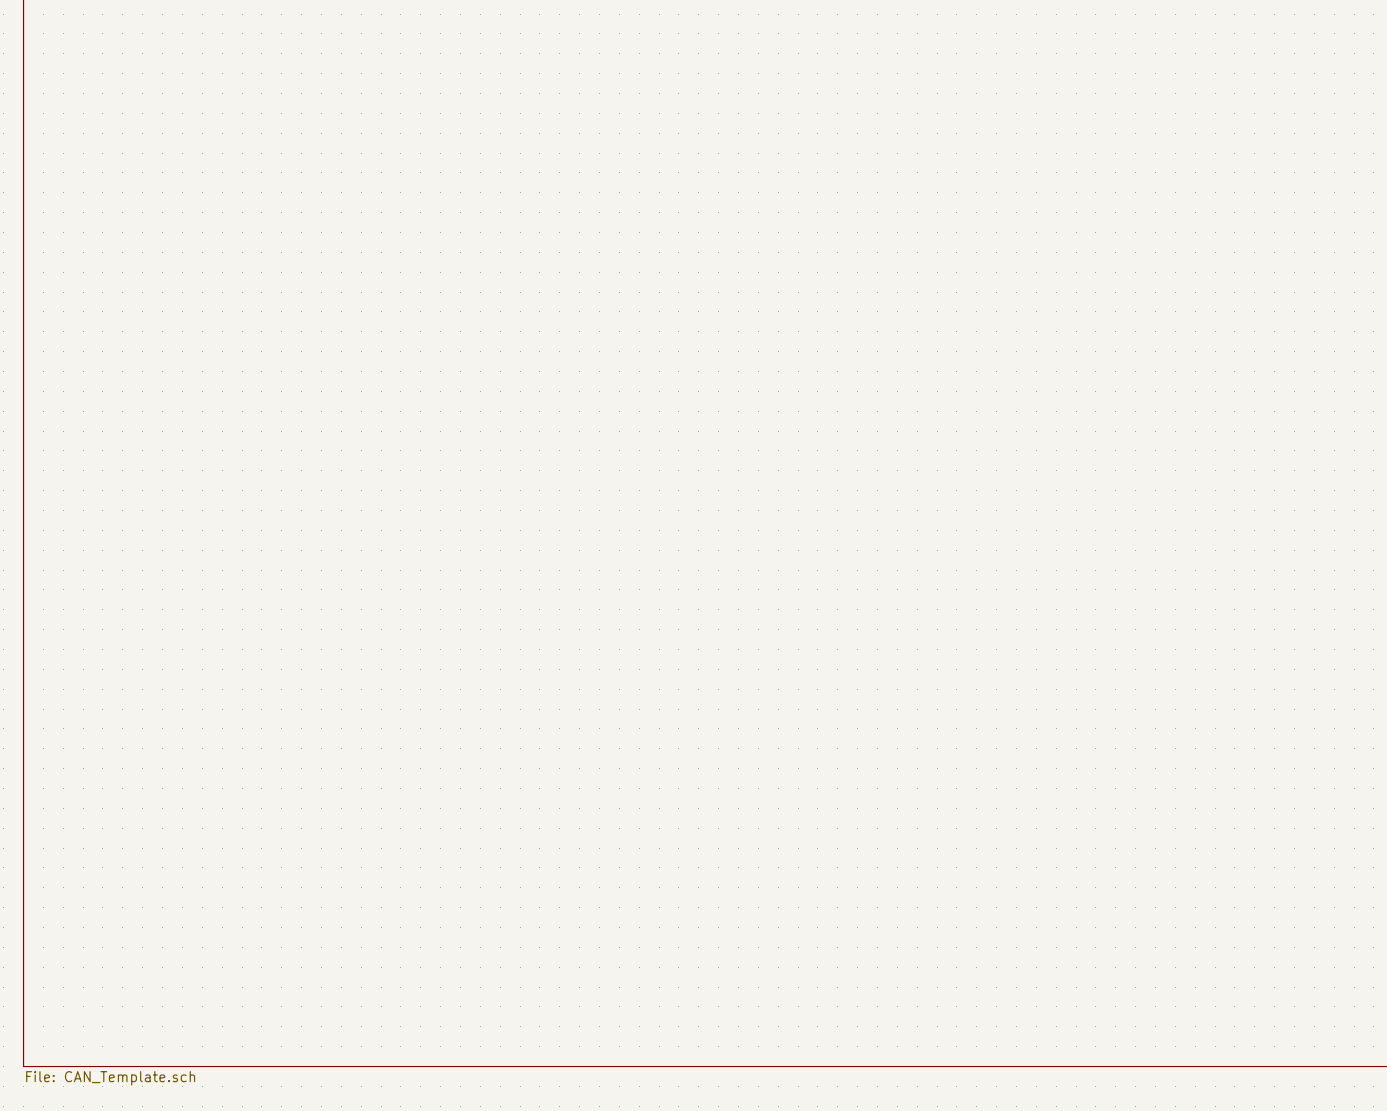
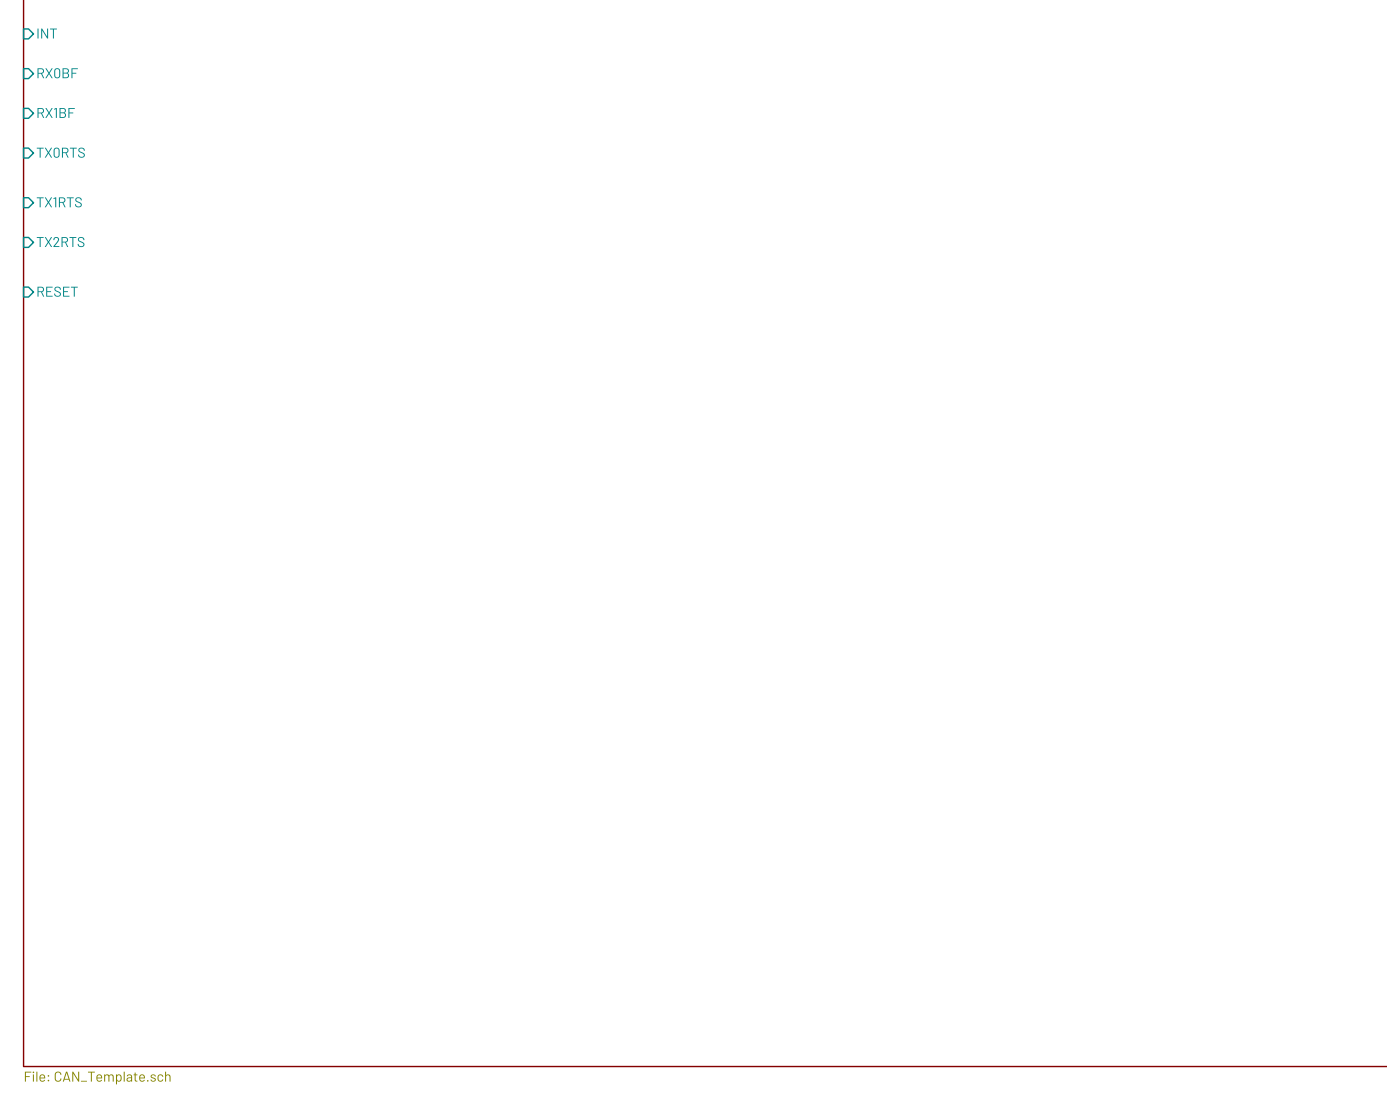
sheet pin: none -> INT (47, 33)
sheet pin: none -> RX0BF (57, 73)
sheet pin: none -> RX1BF (56, 112)
sheet pin: none -> TX0RTS (60, 152)
sheet pin: none -> TX1RTS (59, 202)
sheet pin: none -> TX2RTS (60, 242)
sheet pin: none -> RESET (57, 291)

